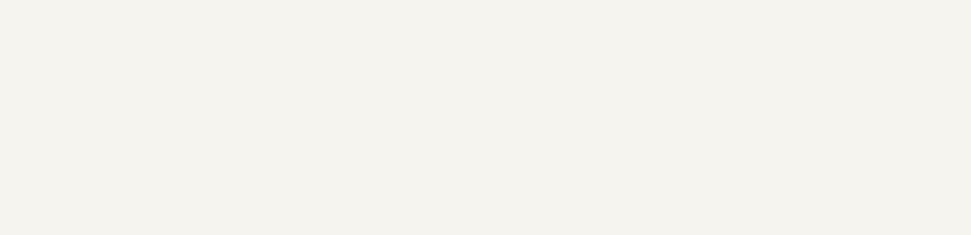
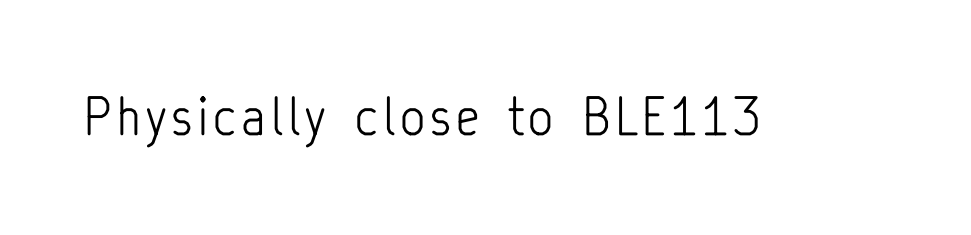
text: none -> Physically close to BLE113 (422, 121)

